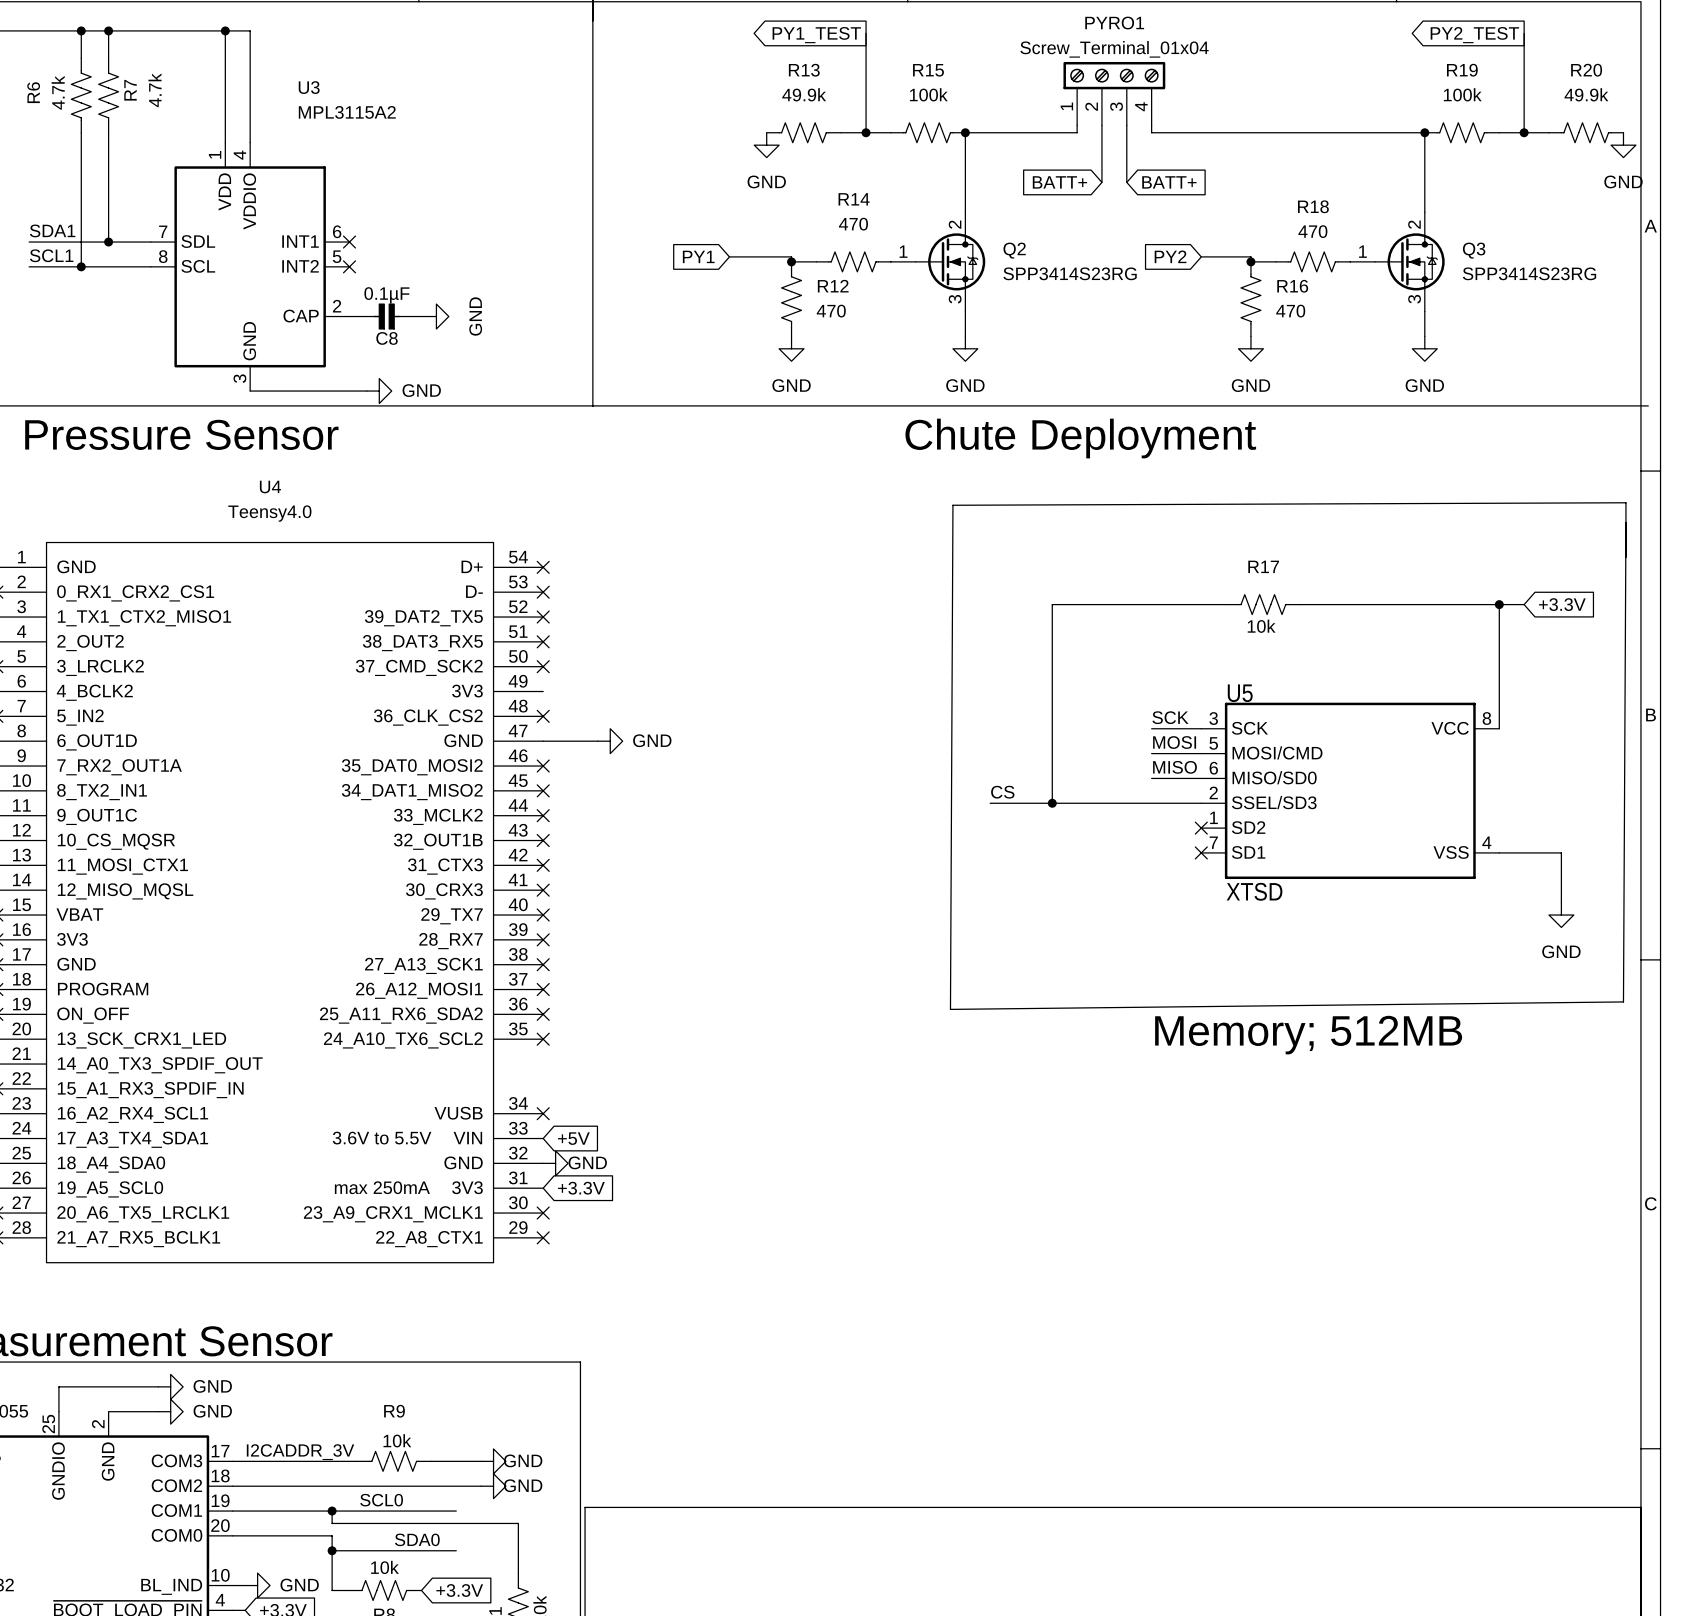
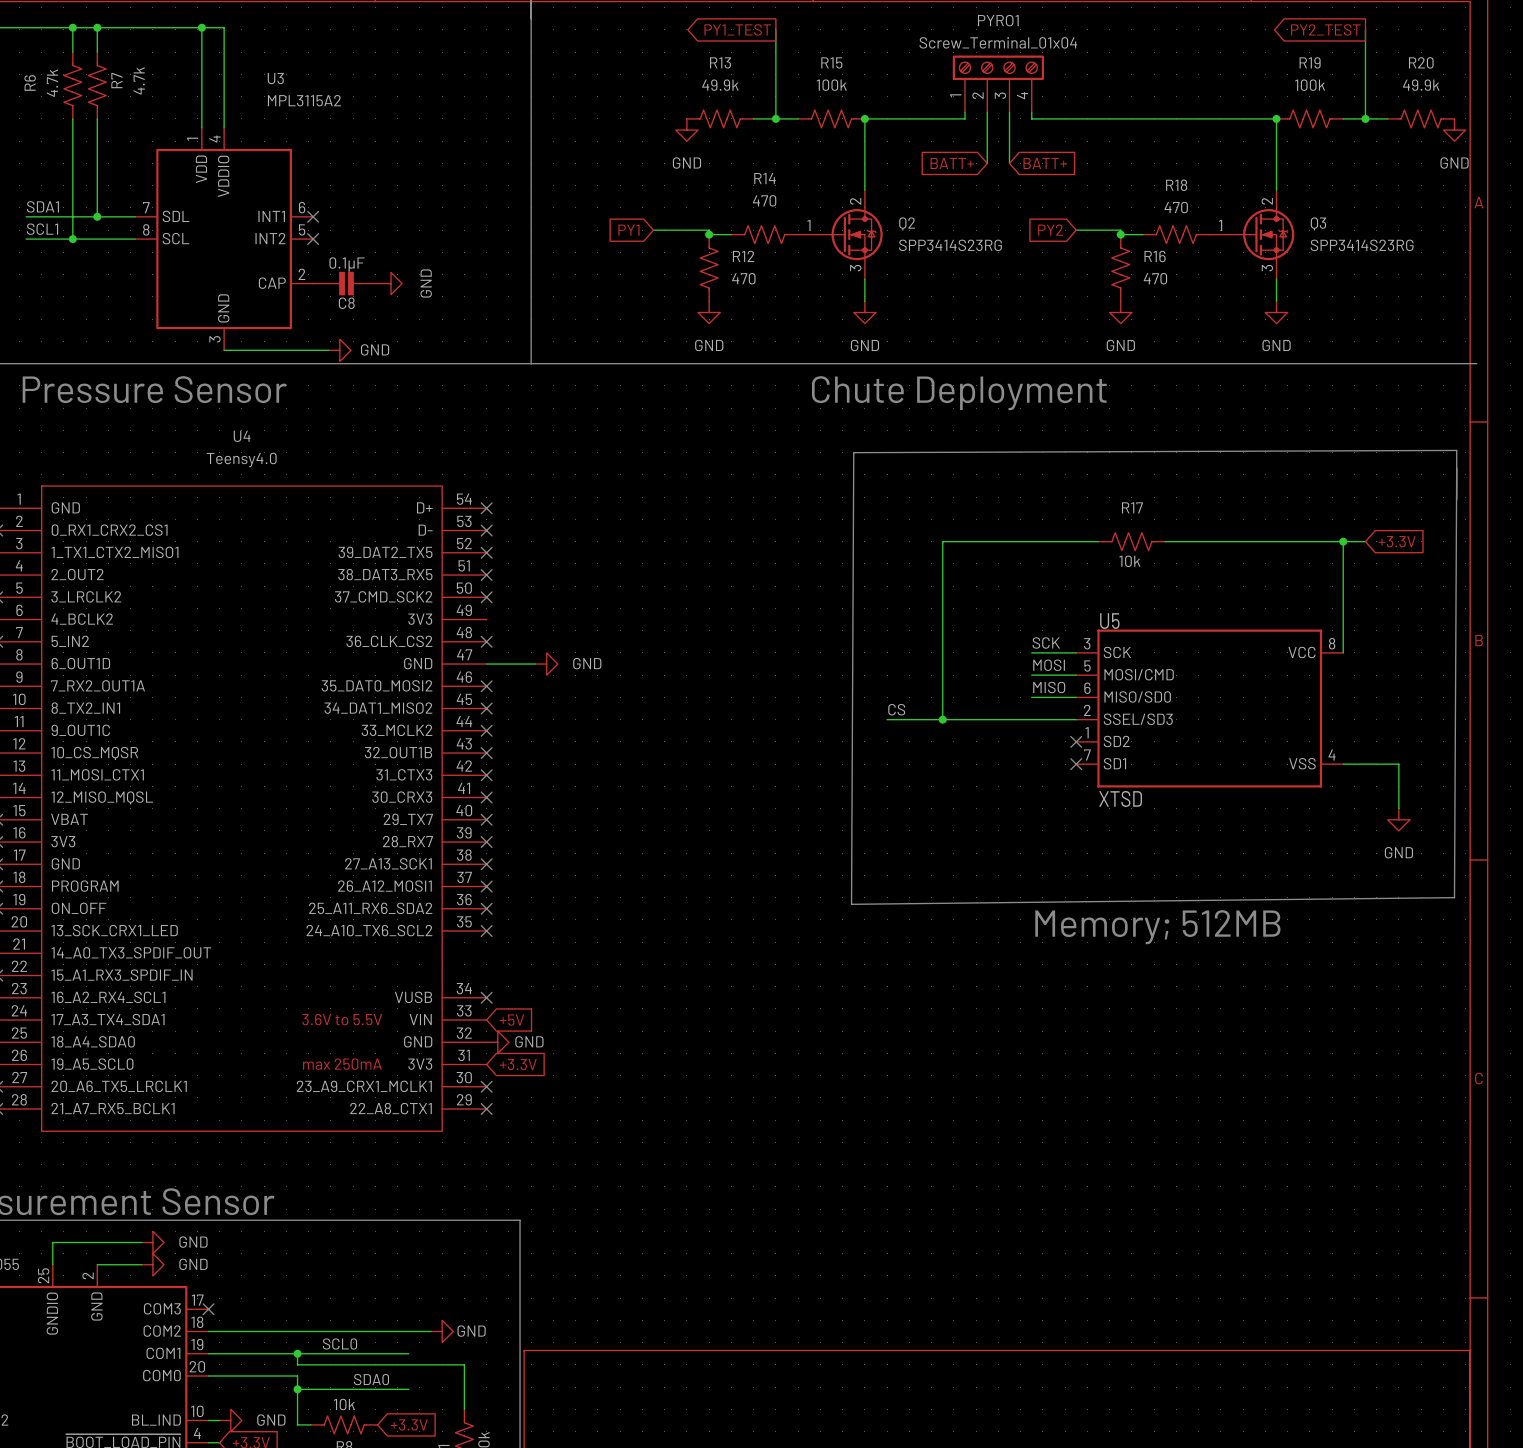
label: I2CADDR_3V (300, 1452) -> none
wire: (232, 1461) (356, 1461) -> none
no-connect mark: none -> (208, 1309)
R9: 10k (394, 1461) -> none
wire: (431, 1461) (481, 1461) -> none
power symbol: GND (493, 1461) -> none

